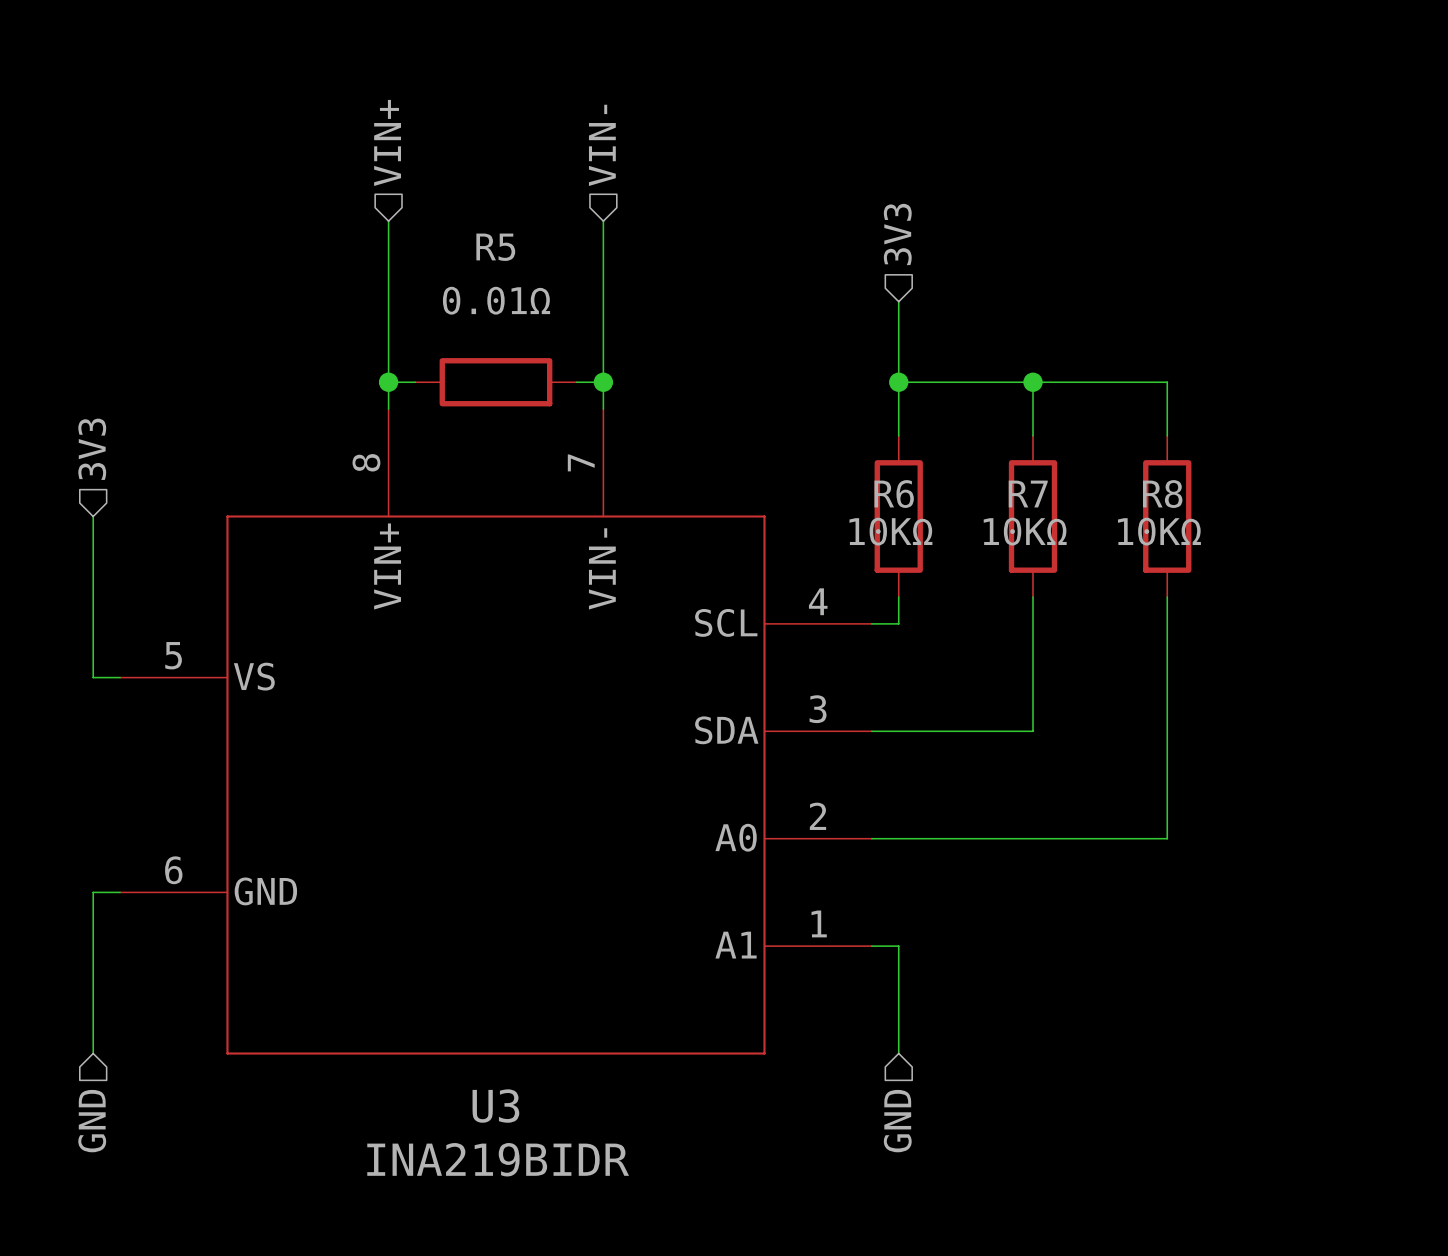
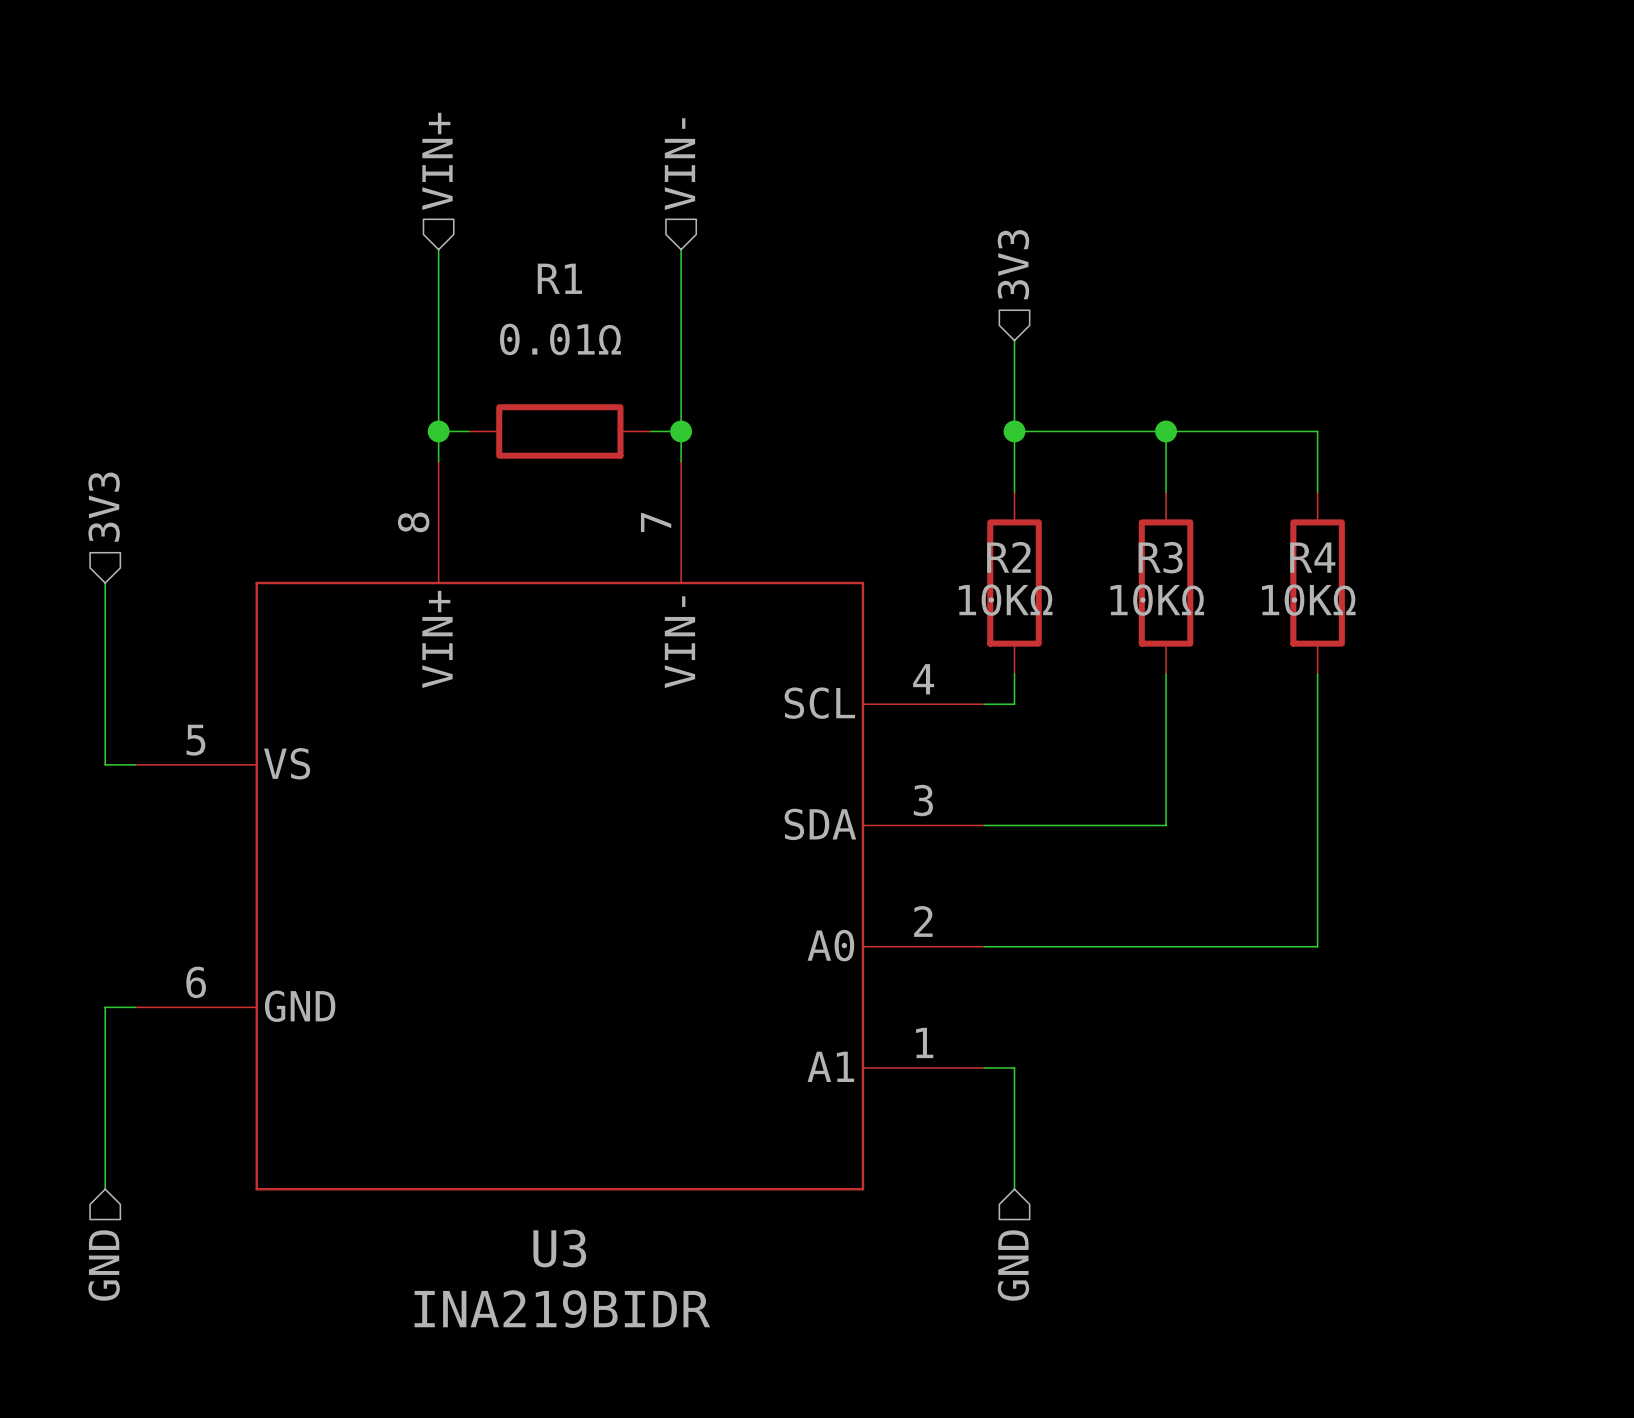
R5 name: R5 (495, 247) -> R1 (559, 278)
R6 name: R6 (894, 494) -> R2 (1008, 557)
R7 name: R7 (1028, 494) -> R3 (1160, 557)
R8 name: R8 (1162, 494) -> R4 (1312, 557)

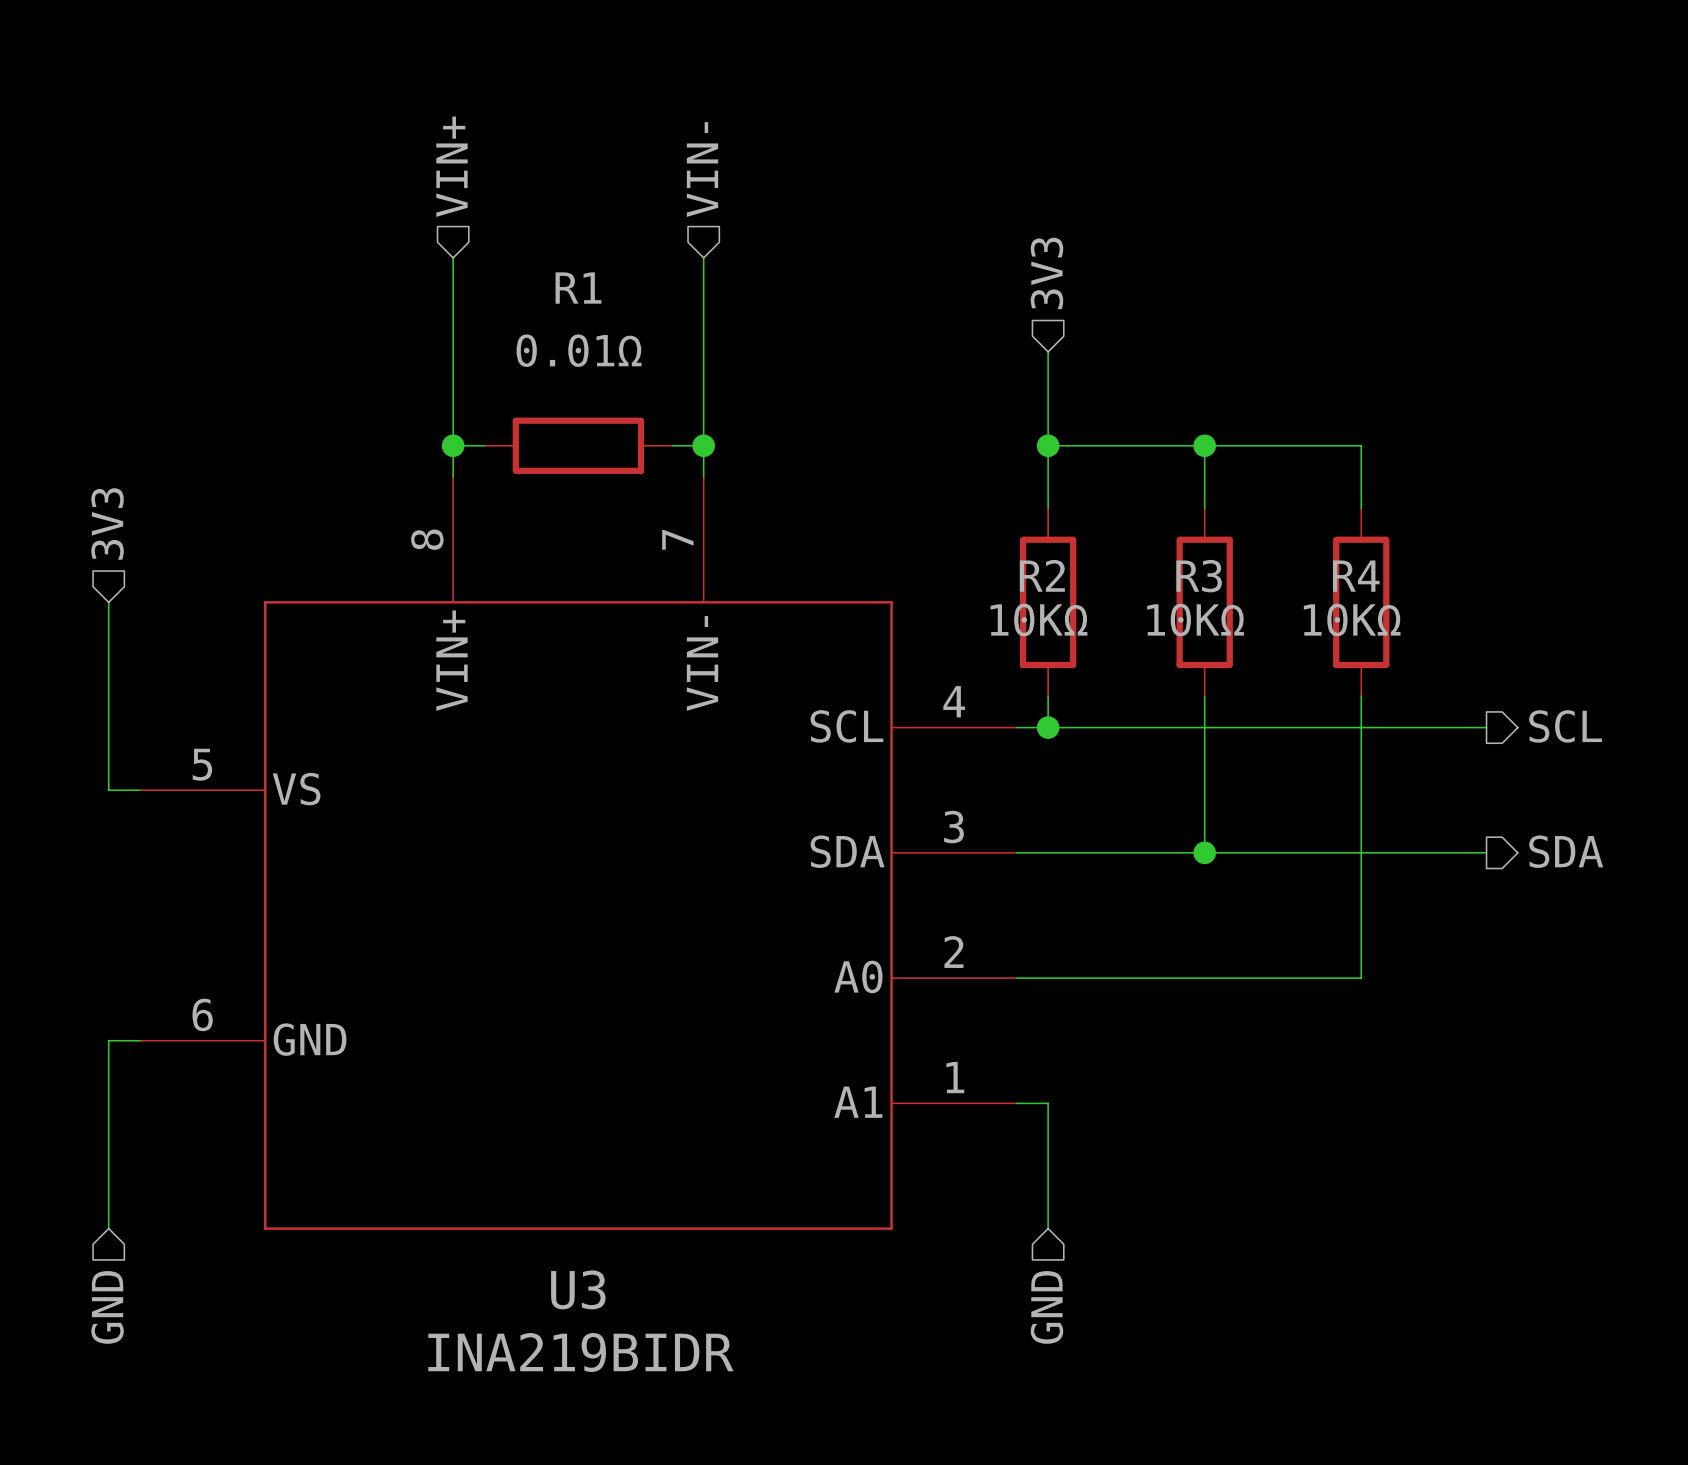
hierarchical label: none -> SCL (1565, 726)
wire: none -> (1048, 727) (1486, 727)
junction: none -> (1048, 727)
hierarchical label: none -> SDA (1566, 851)
wire: none -> (1204, 852) (1486, 852)
junction: none -> (1204, 852)

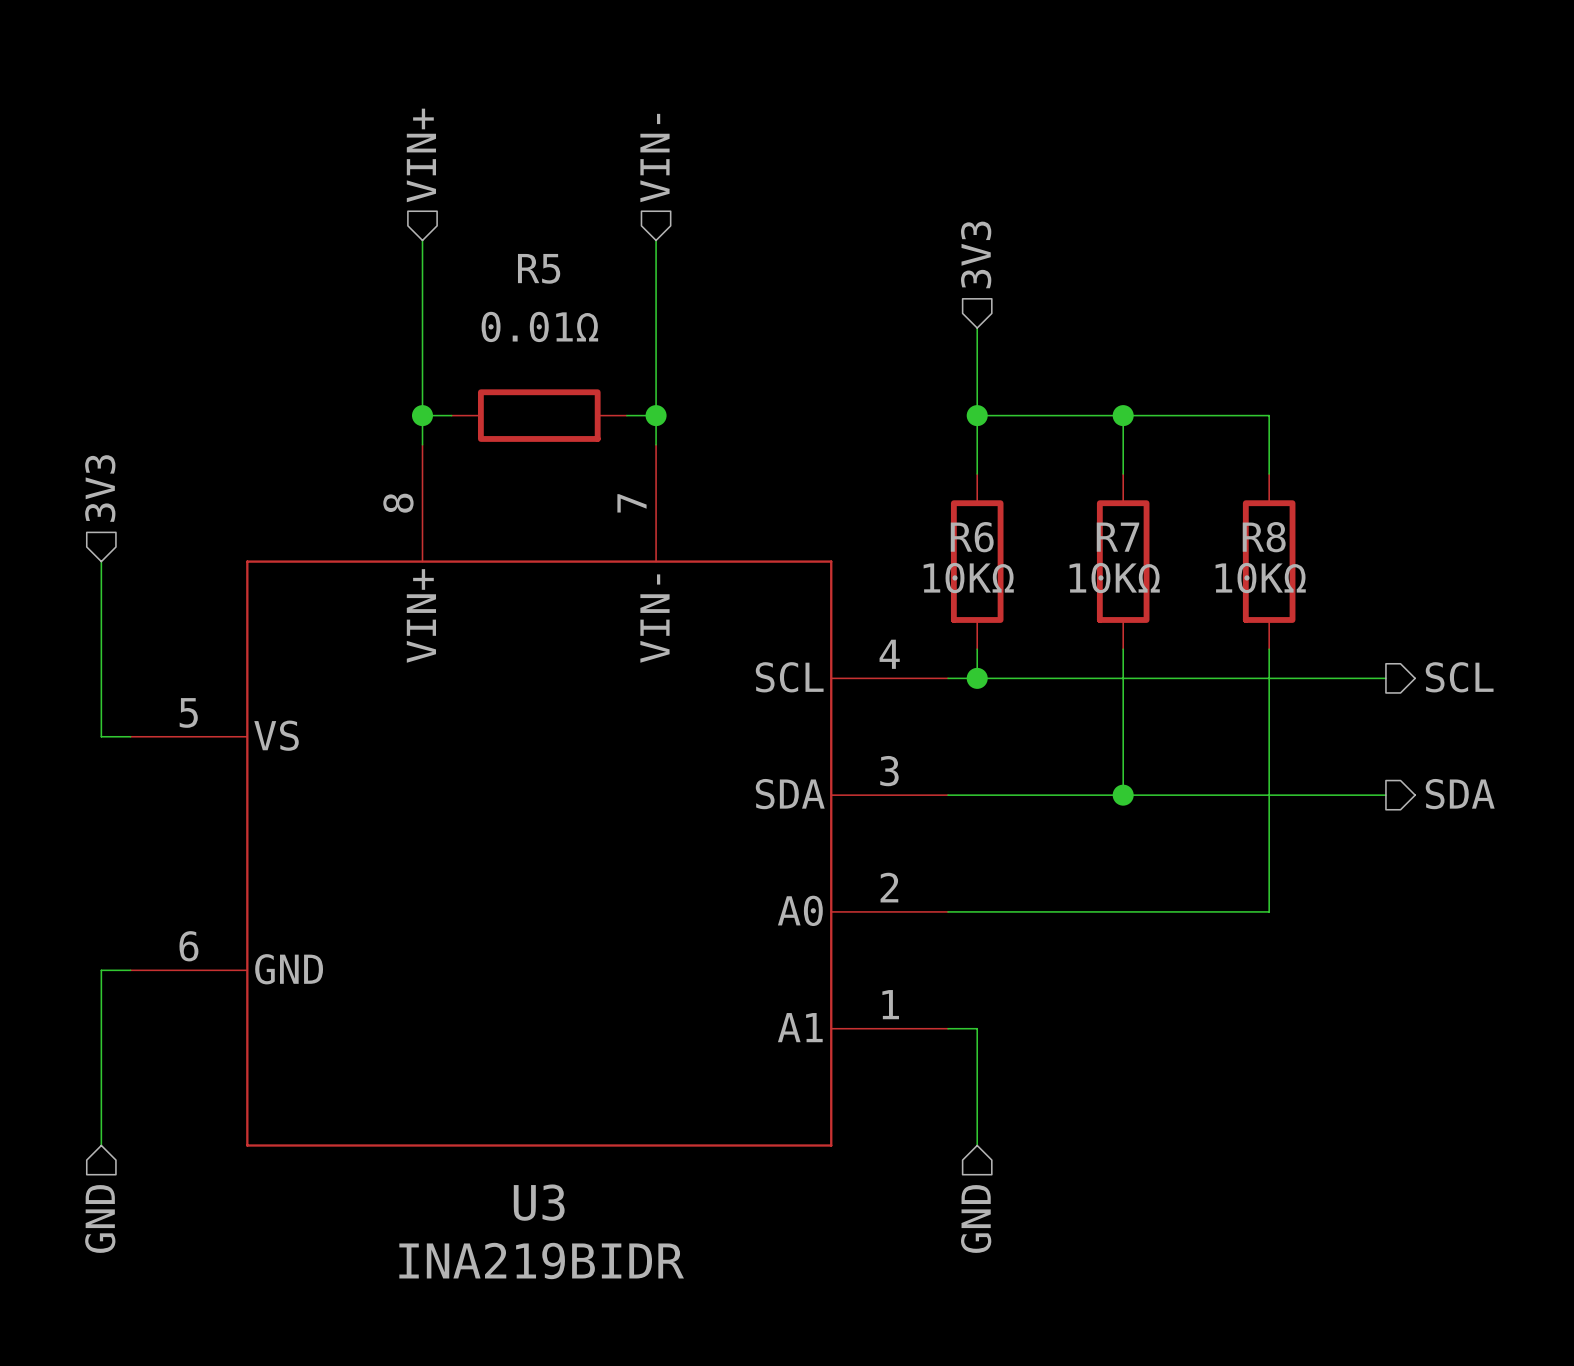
R1 name: R1 (578, 288) -> R5 (539, 268)
R2 name: R2 (1042, 575) -> R6 (972, 537)
R3 name: R3 (1199, 576) -> R7 (1118, 537)
R4 name: R4 (1356, 576) -> R8 (1264, 537)

